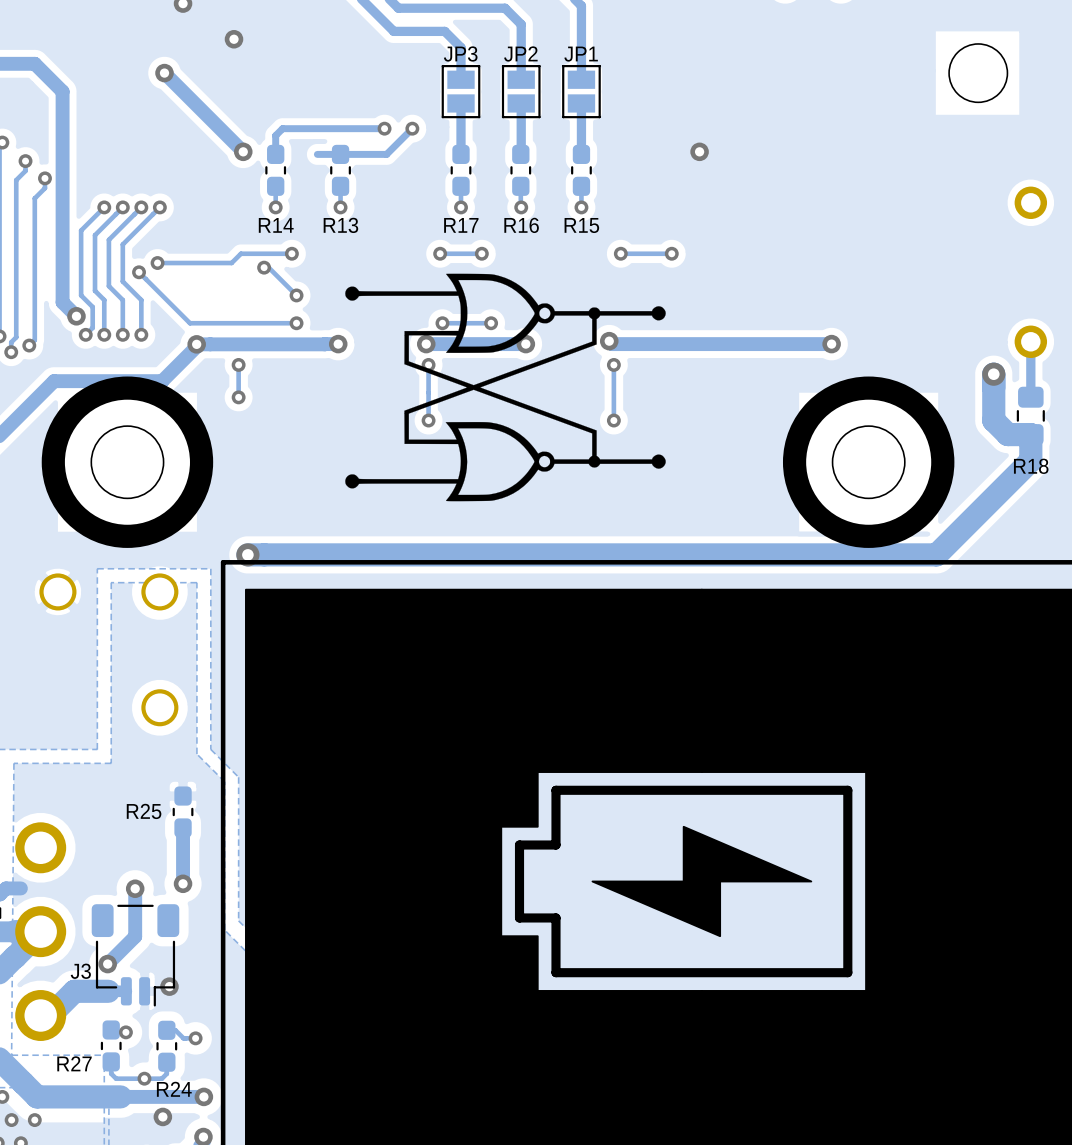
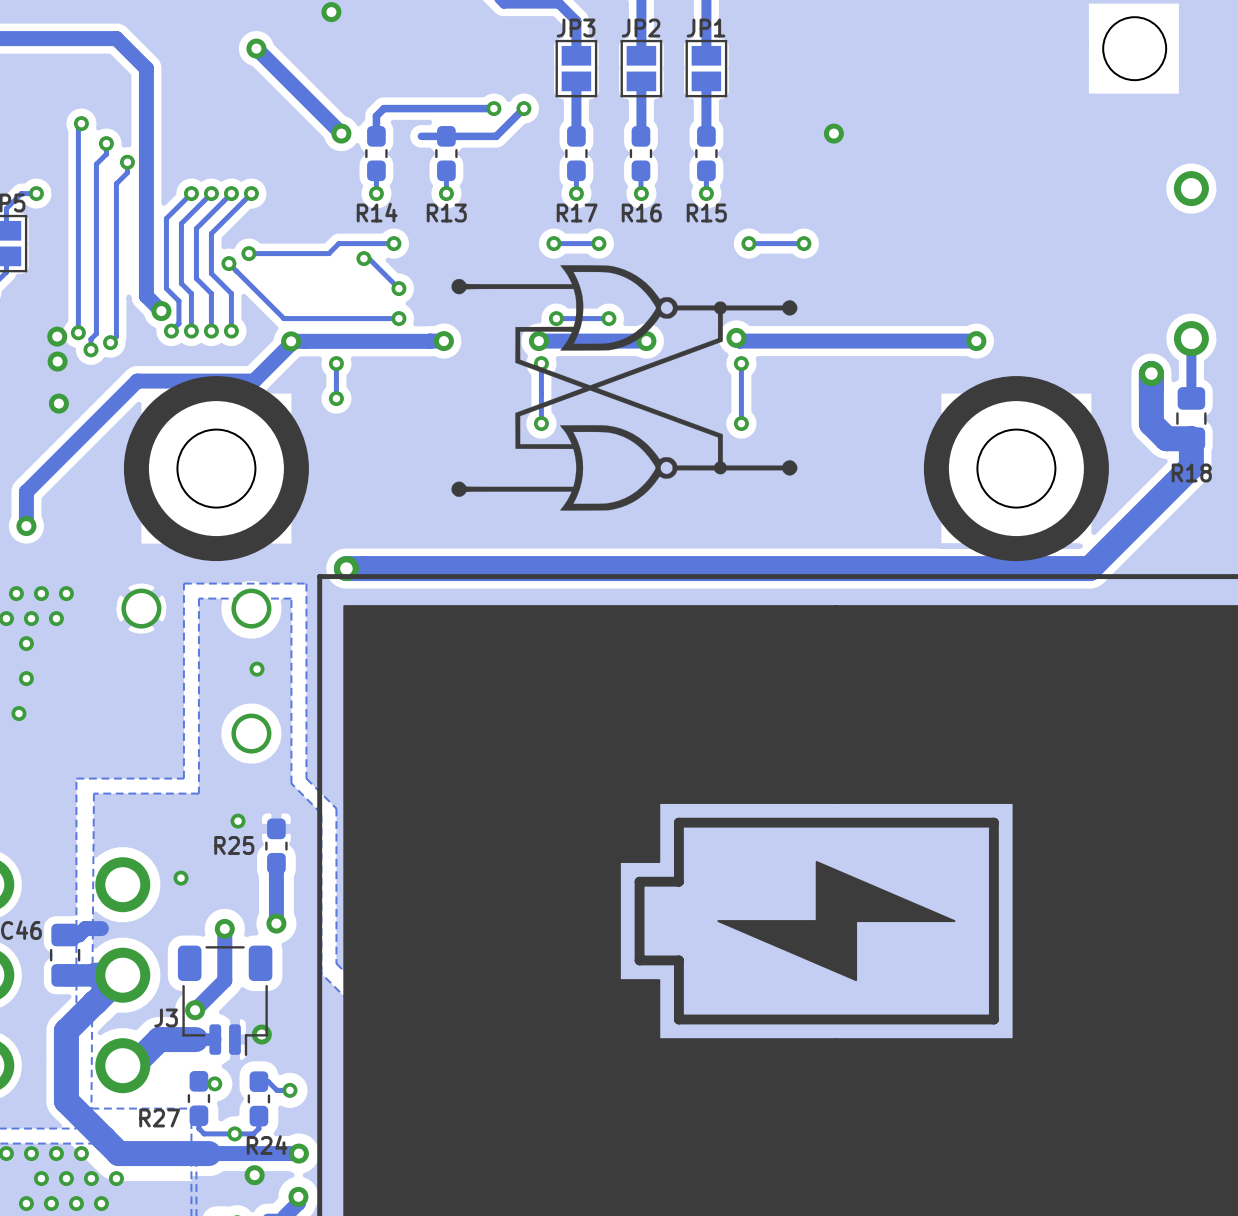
via: none -> (257, 669)
via: none -> (238, 821)
via: none -> (181, 878)

